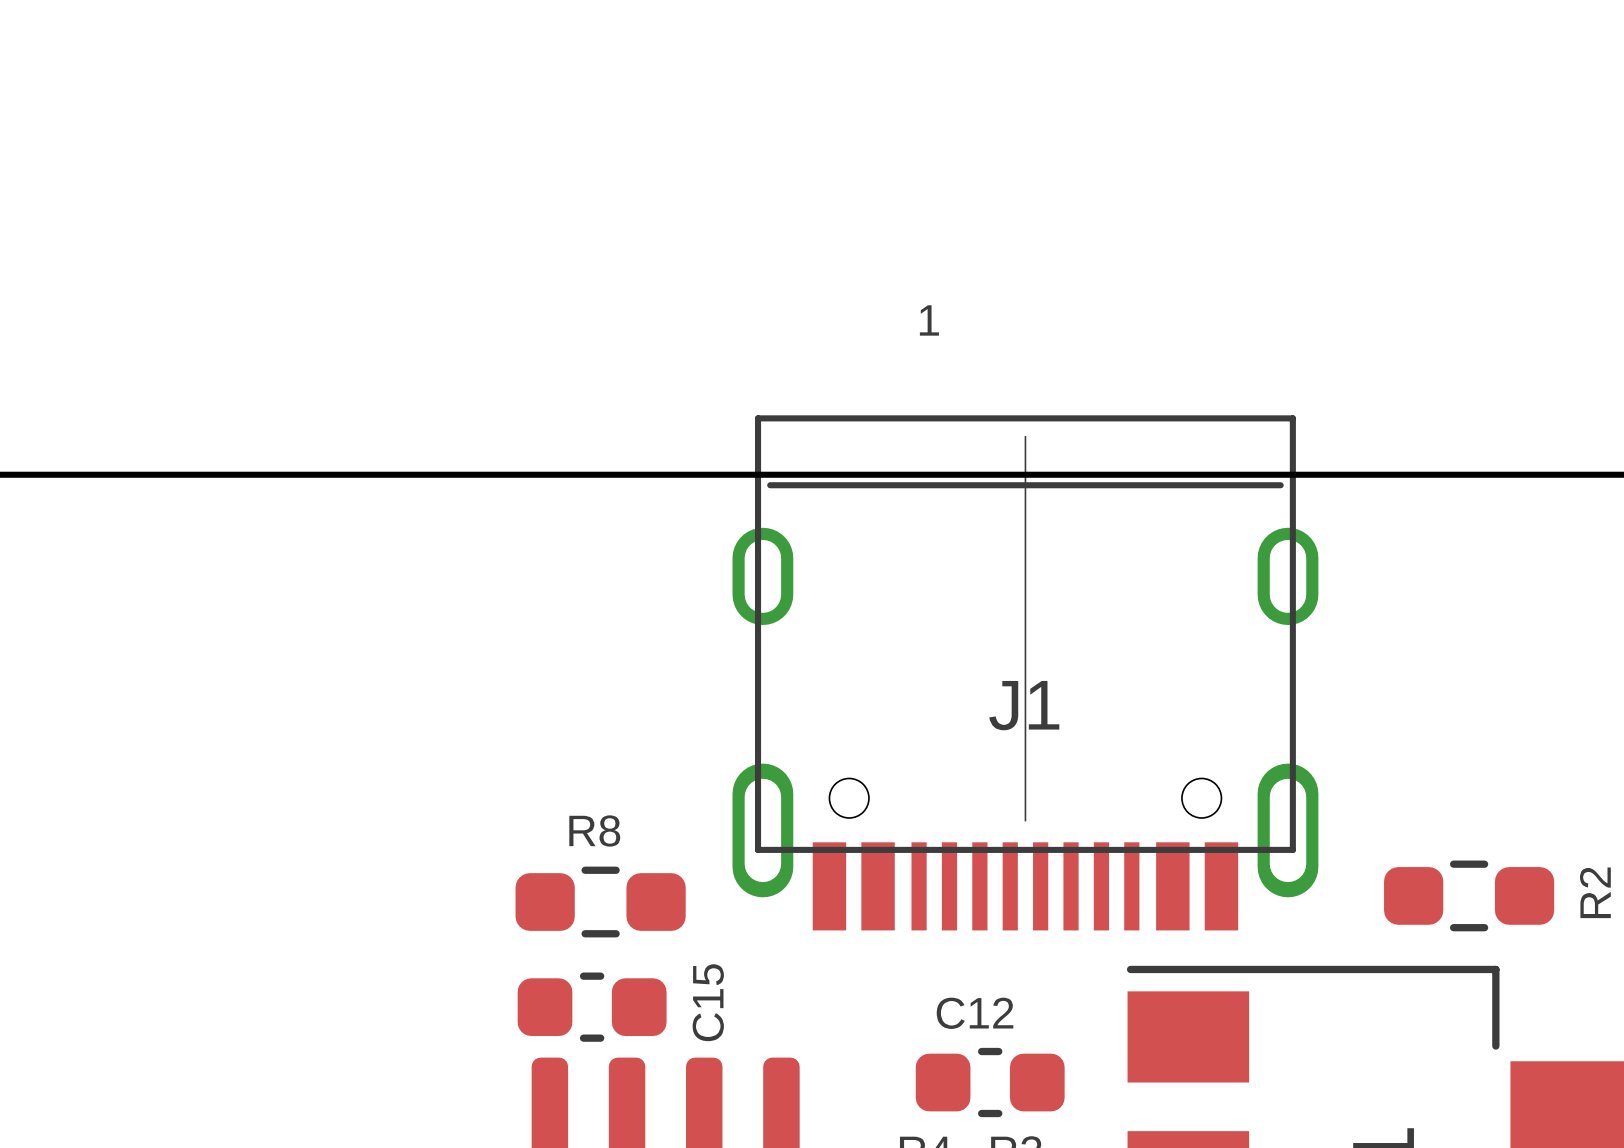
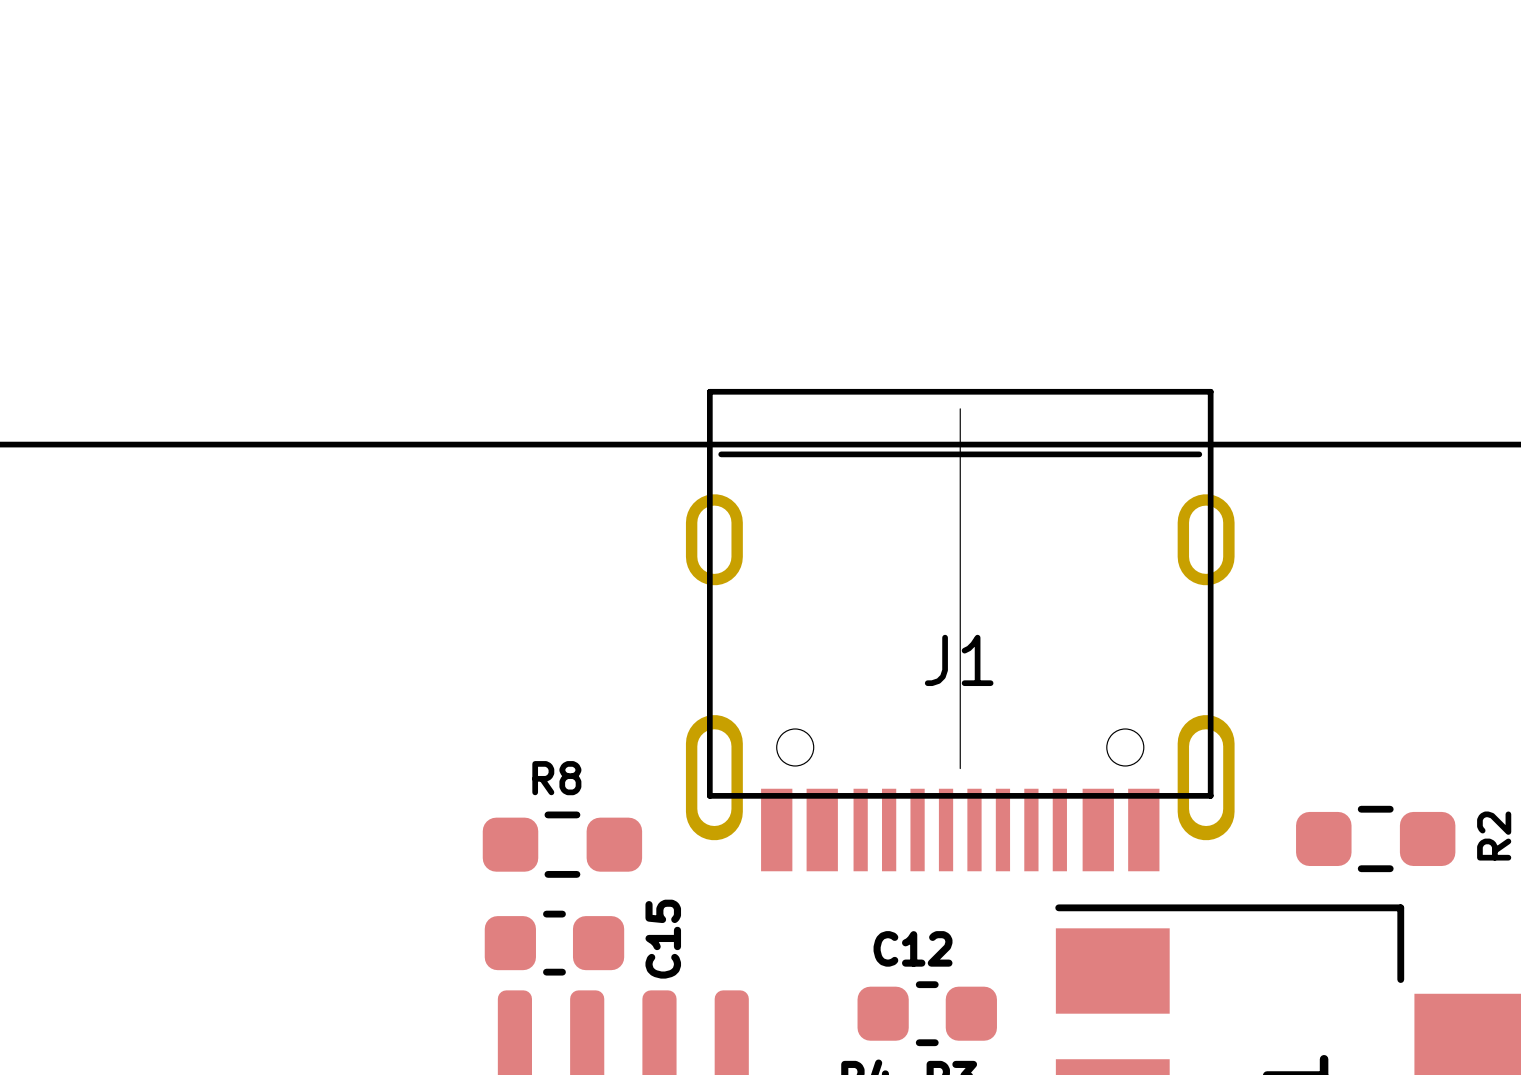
text: 1 (929, 320) -> none

